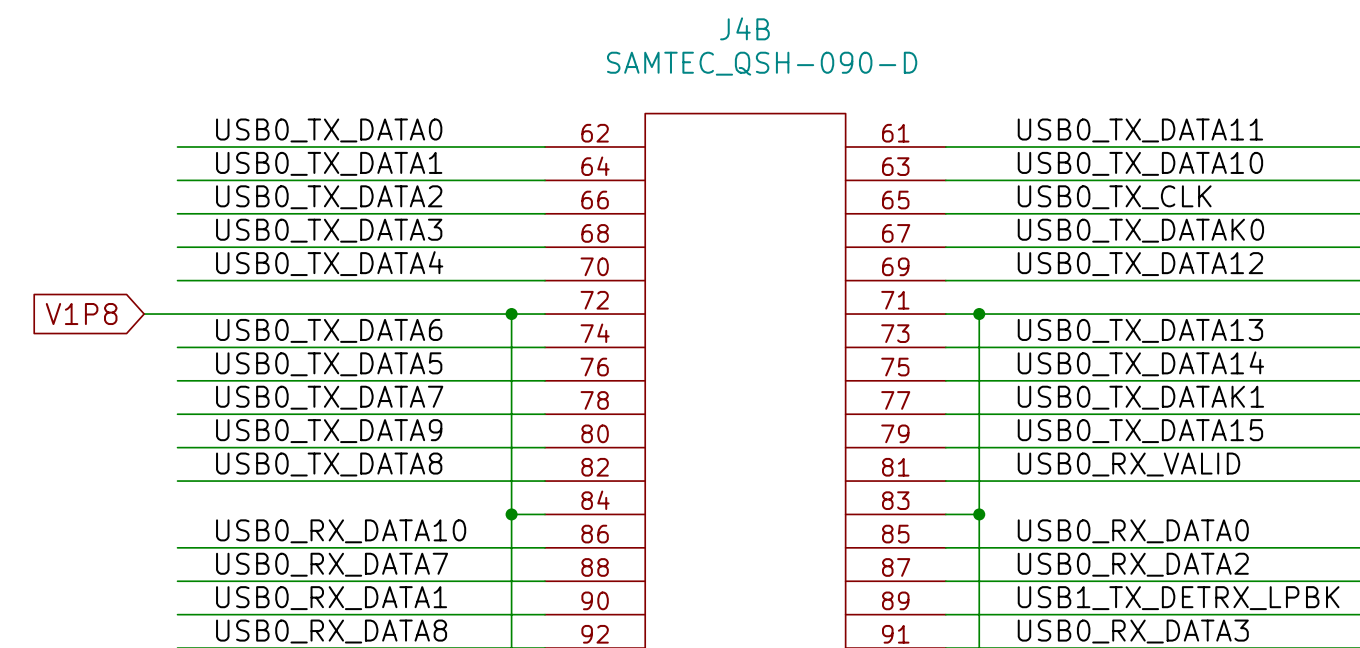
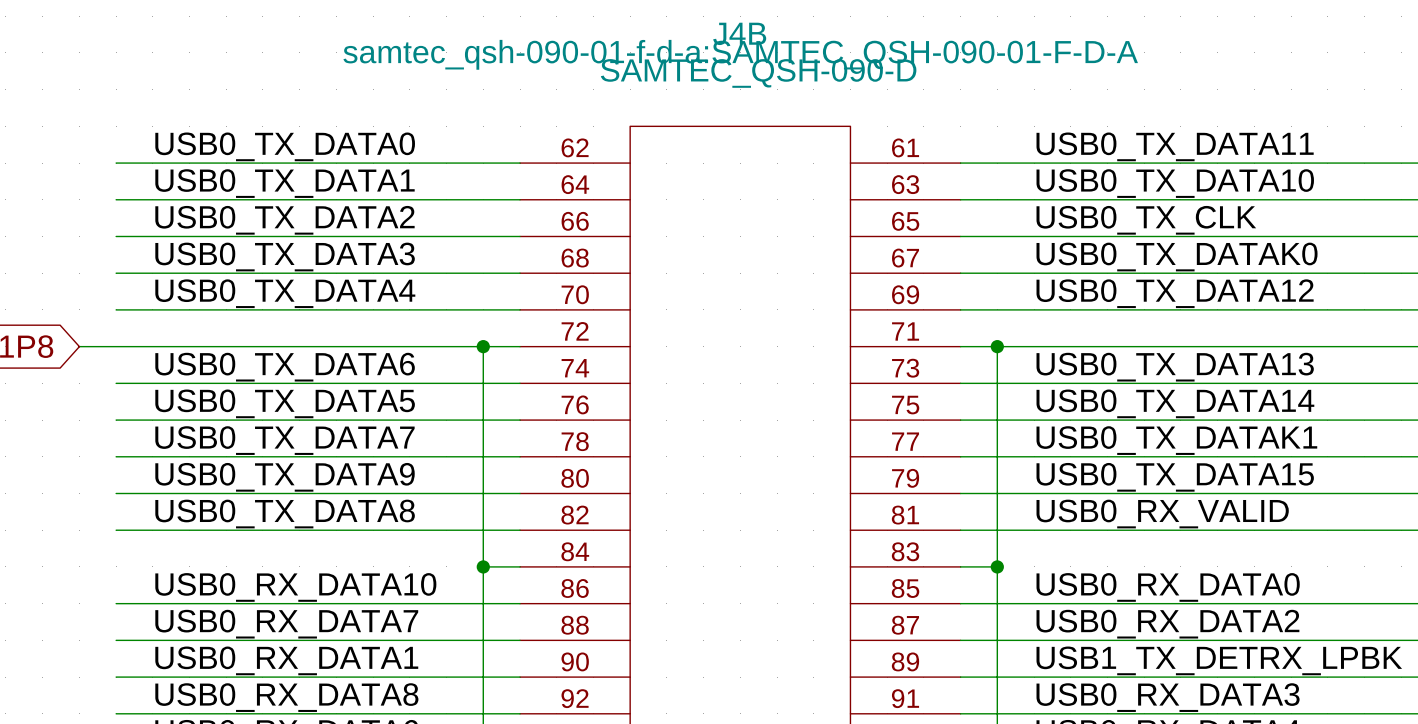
J4B text: none -> samtec_qsh-090-01-f-d-a:SAMTEC_QSH-090-01-F-D-A (740, 54)

